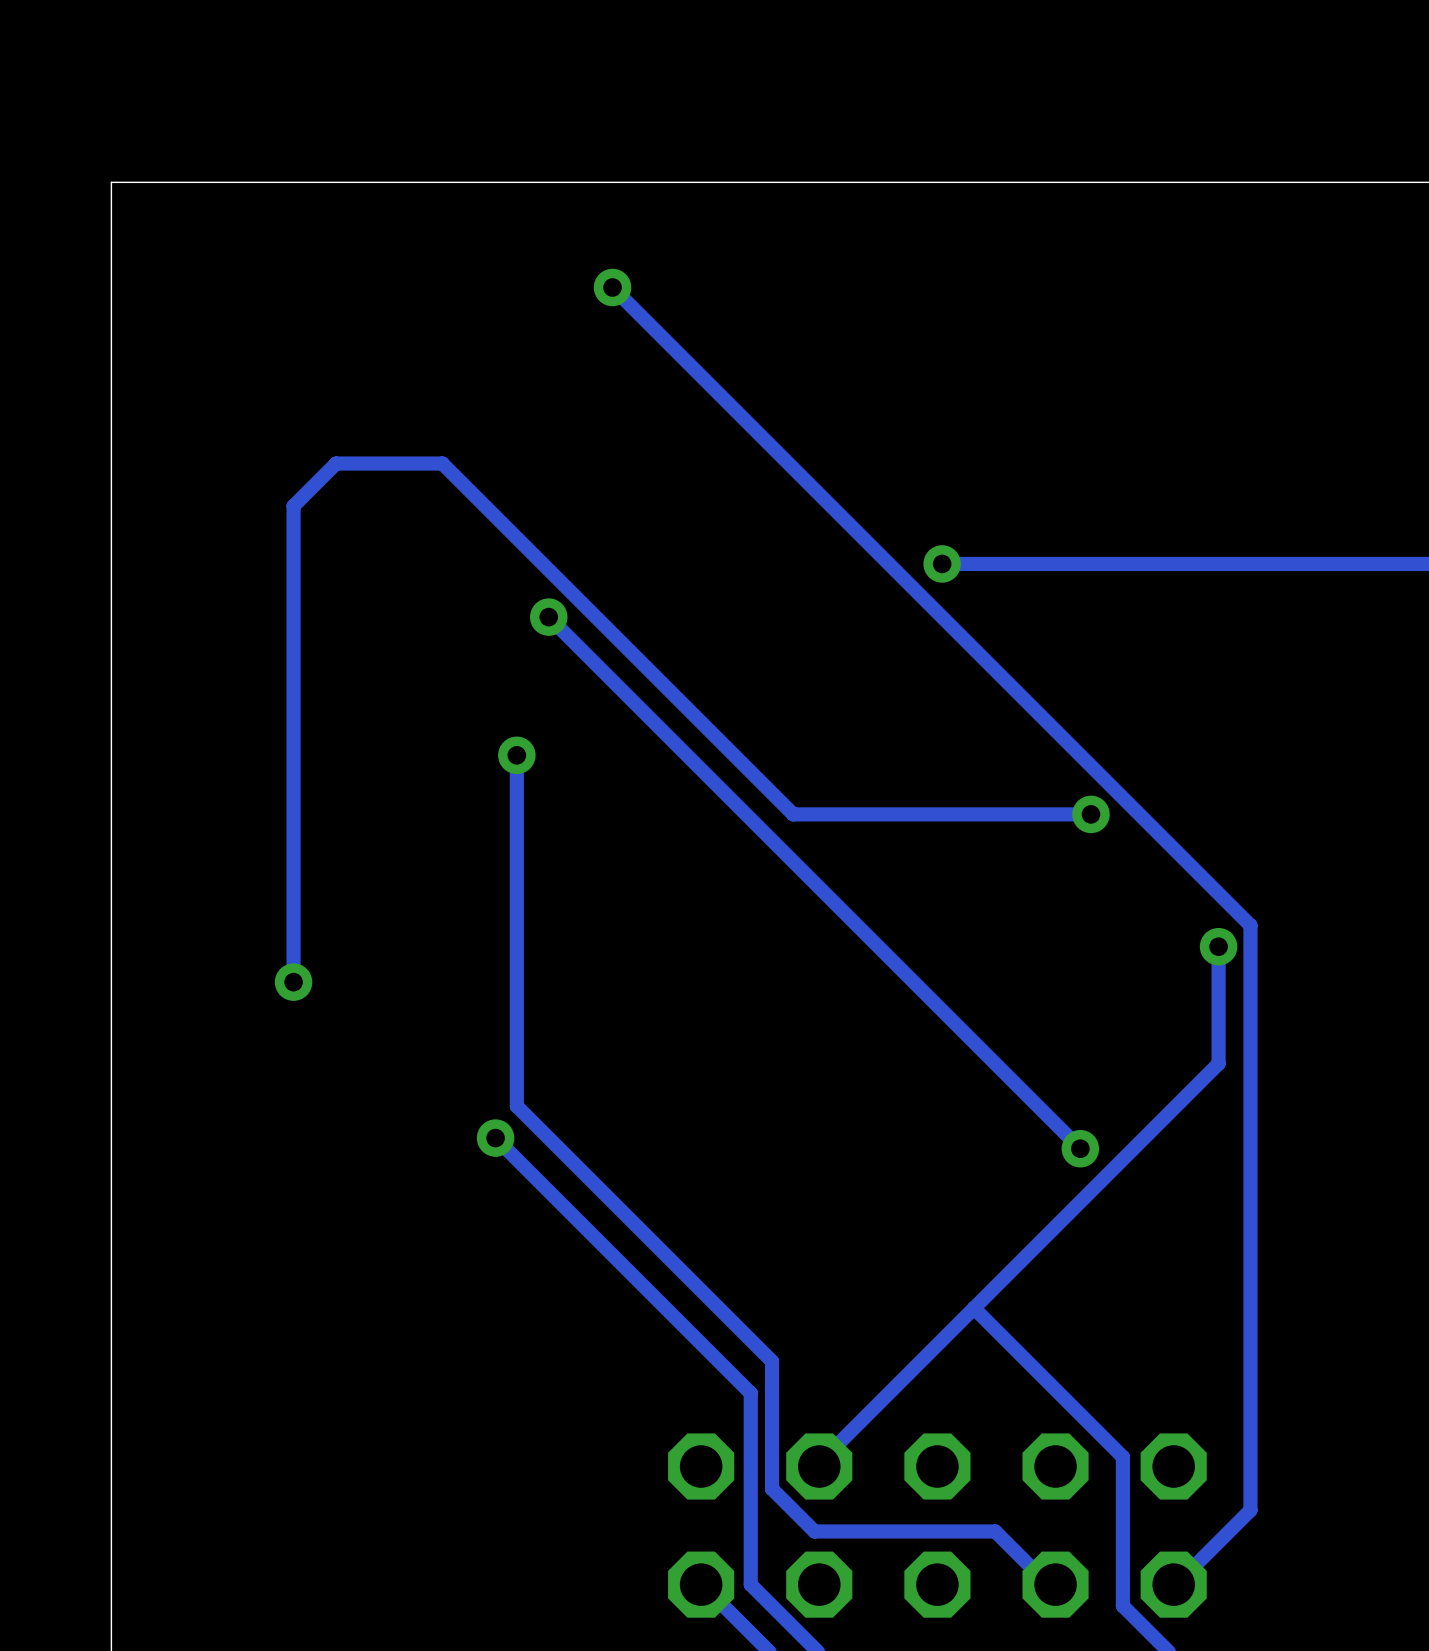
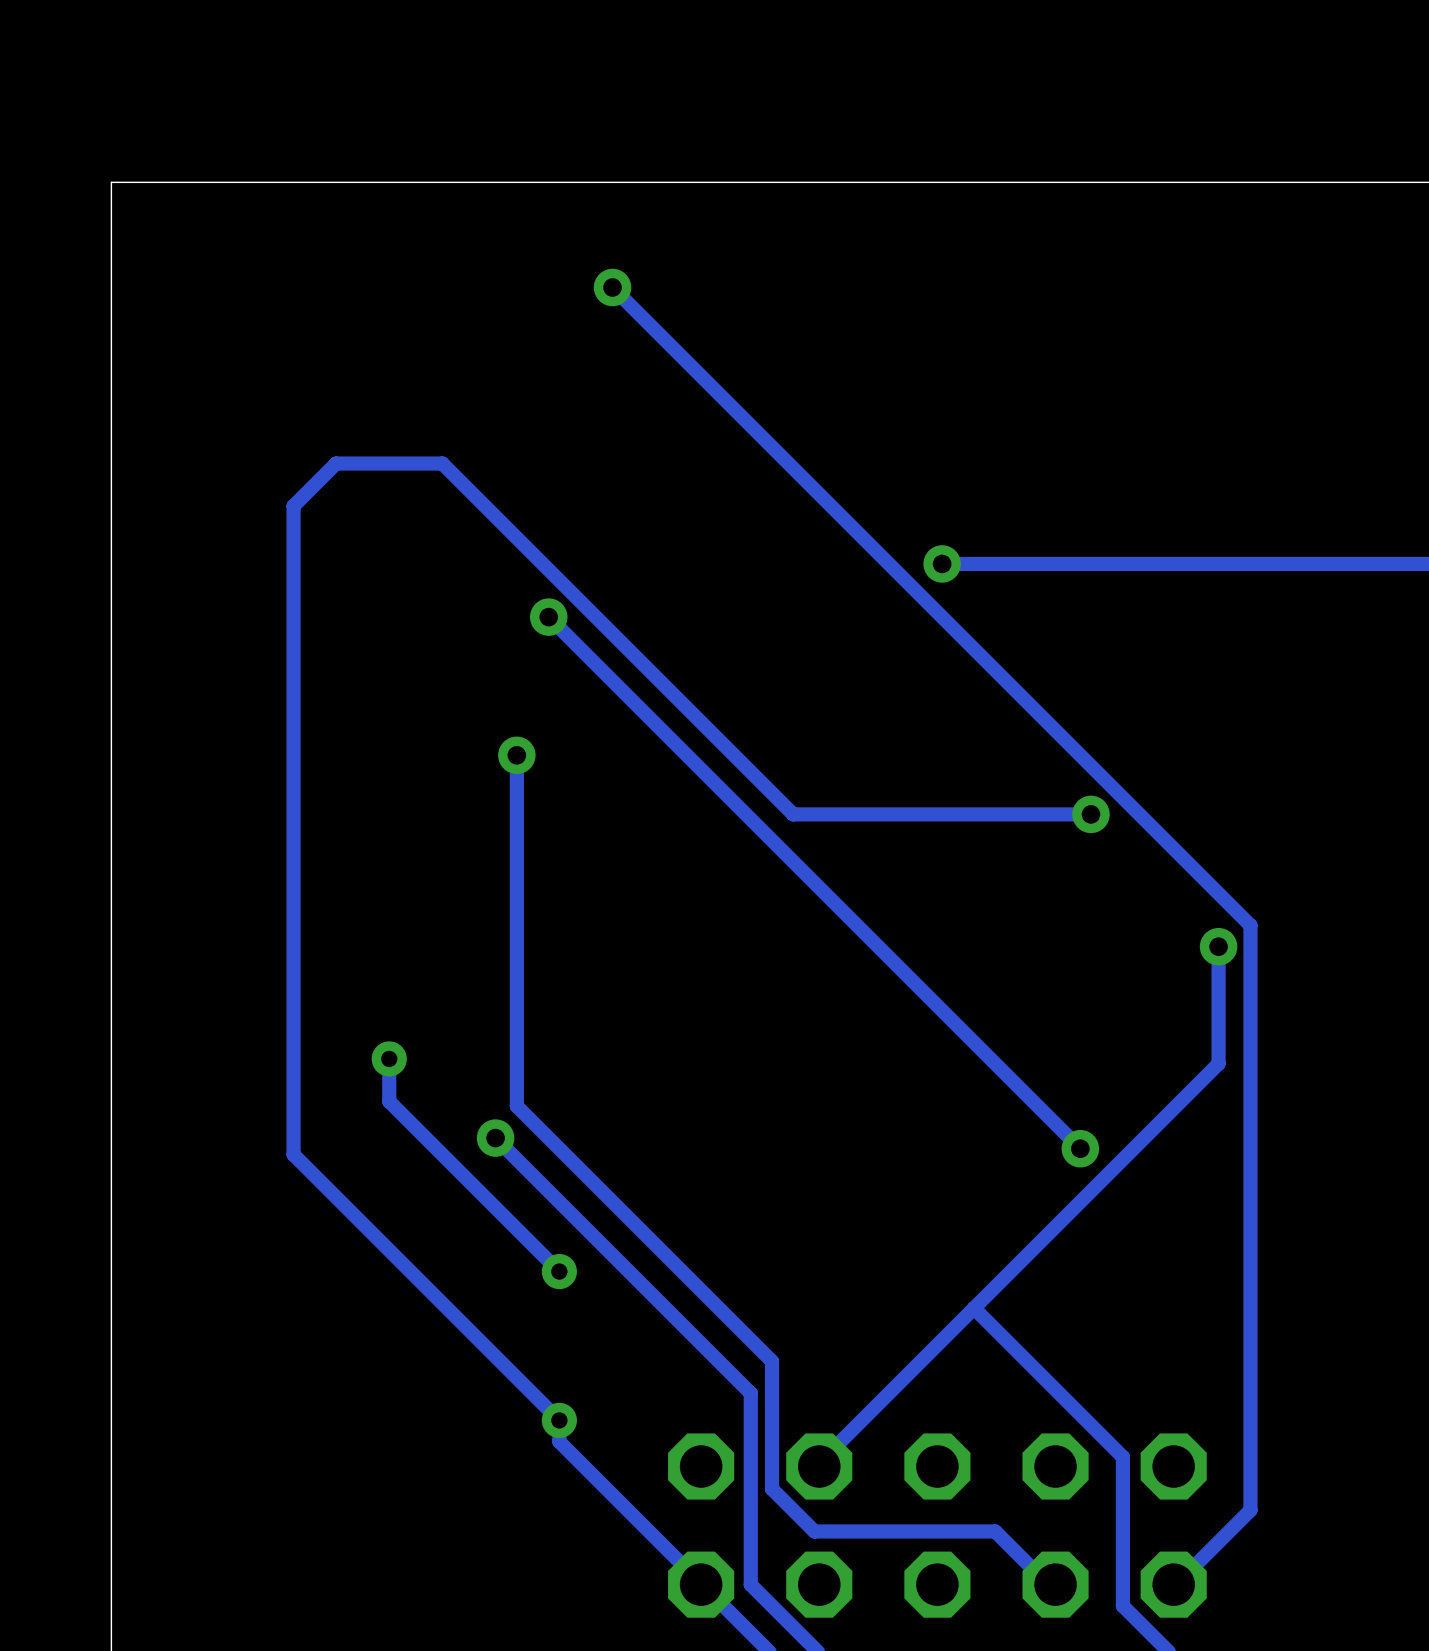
track: none -> (293, 982) (293, 1154) (559, 1420) (559, 1441) (701, 1584)
via: (293, 982) -> none
track: none -> (389, 1058) (389, 1101) (559, 1271)
via: none -> (389, 1058)
via: none -> (559, 1271)
via: none -> (559, 1420)

